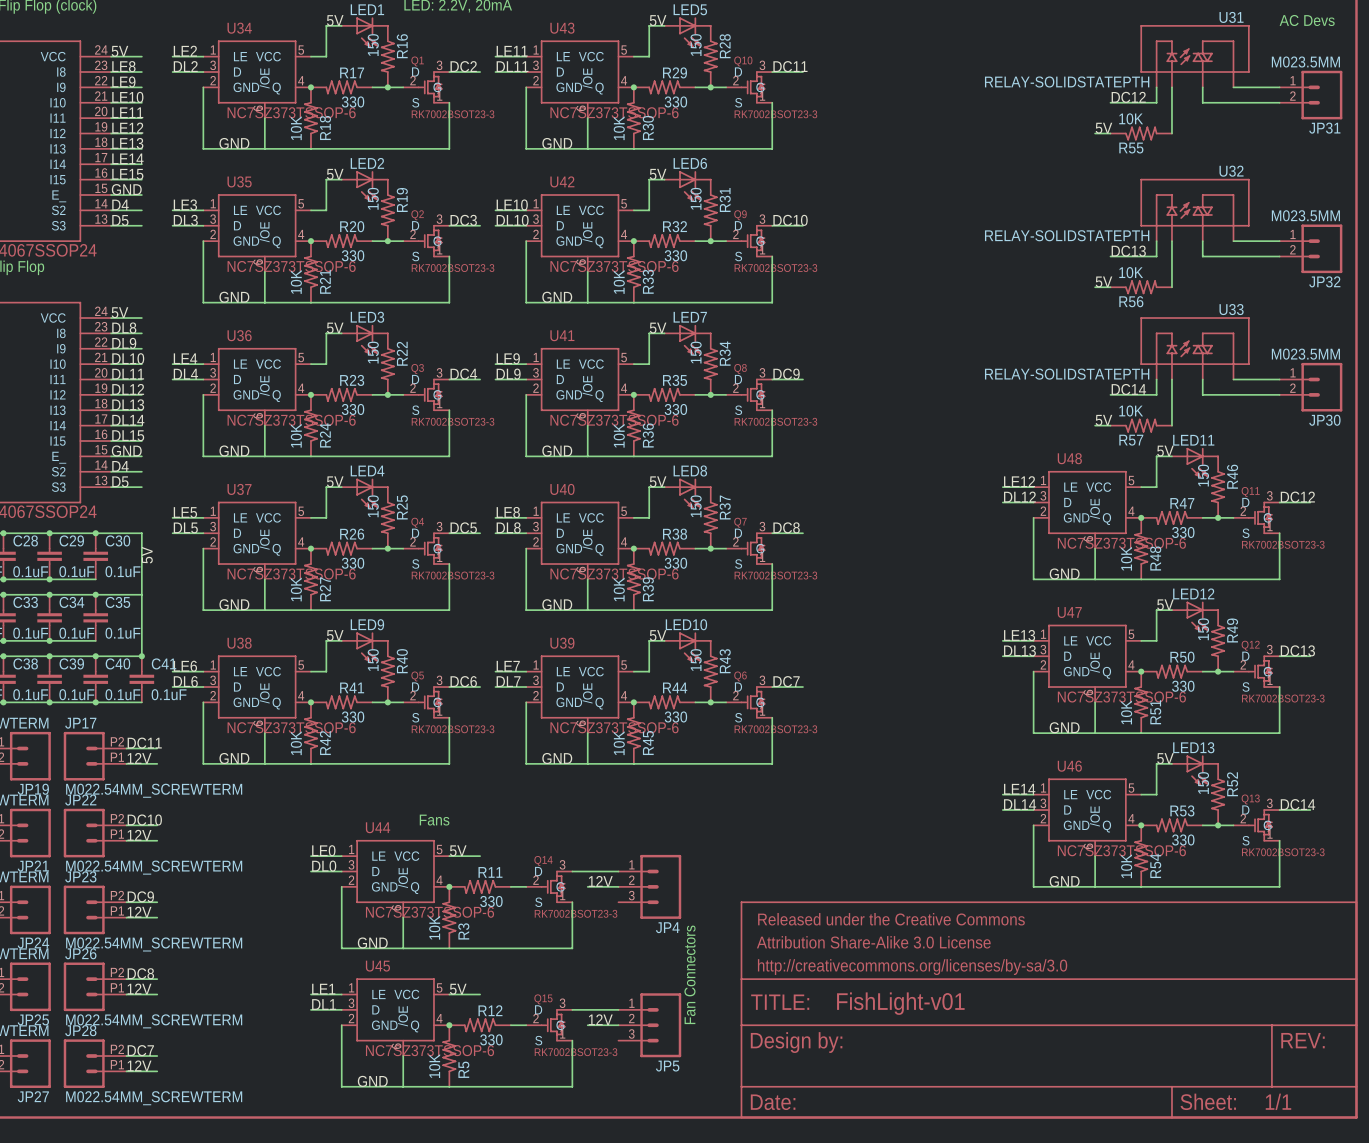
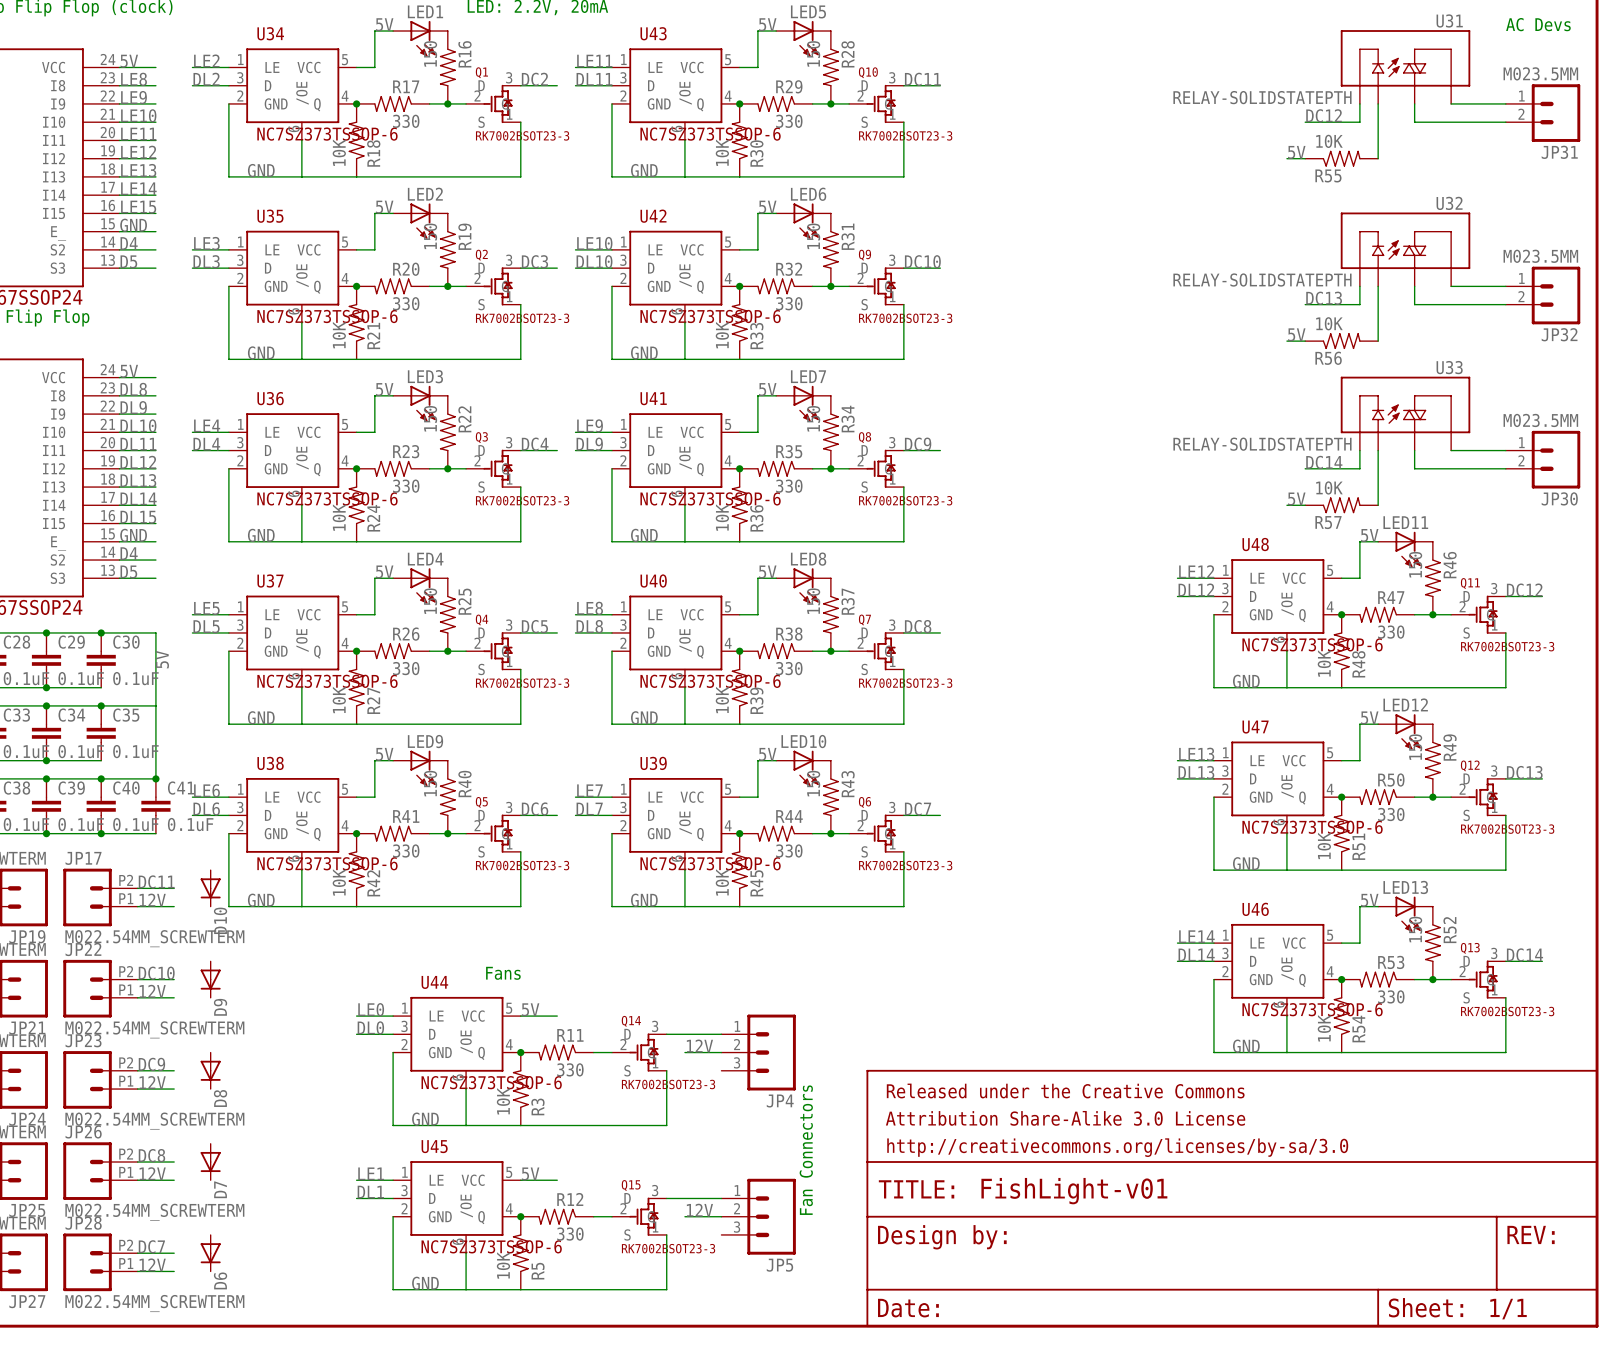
D10: none -> (210, 888)
D9: none -> (210, 979)
D8: none -> (210, 1070)
D7: none -> (210, 1162)
D6: none -> (210, 1253)

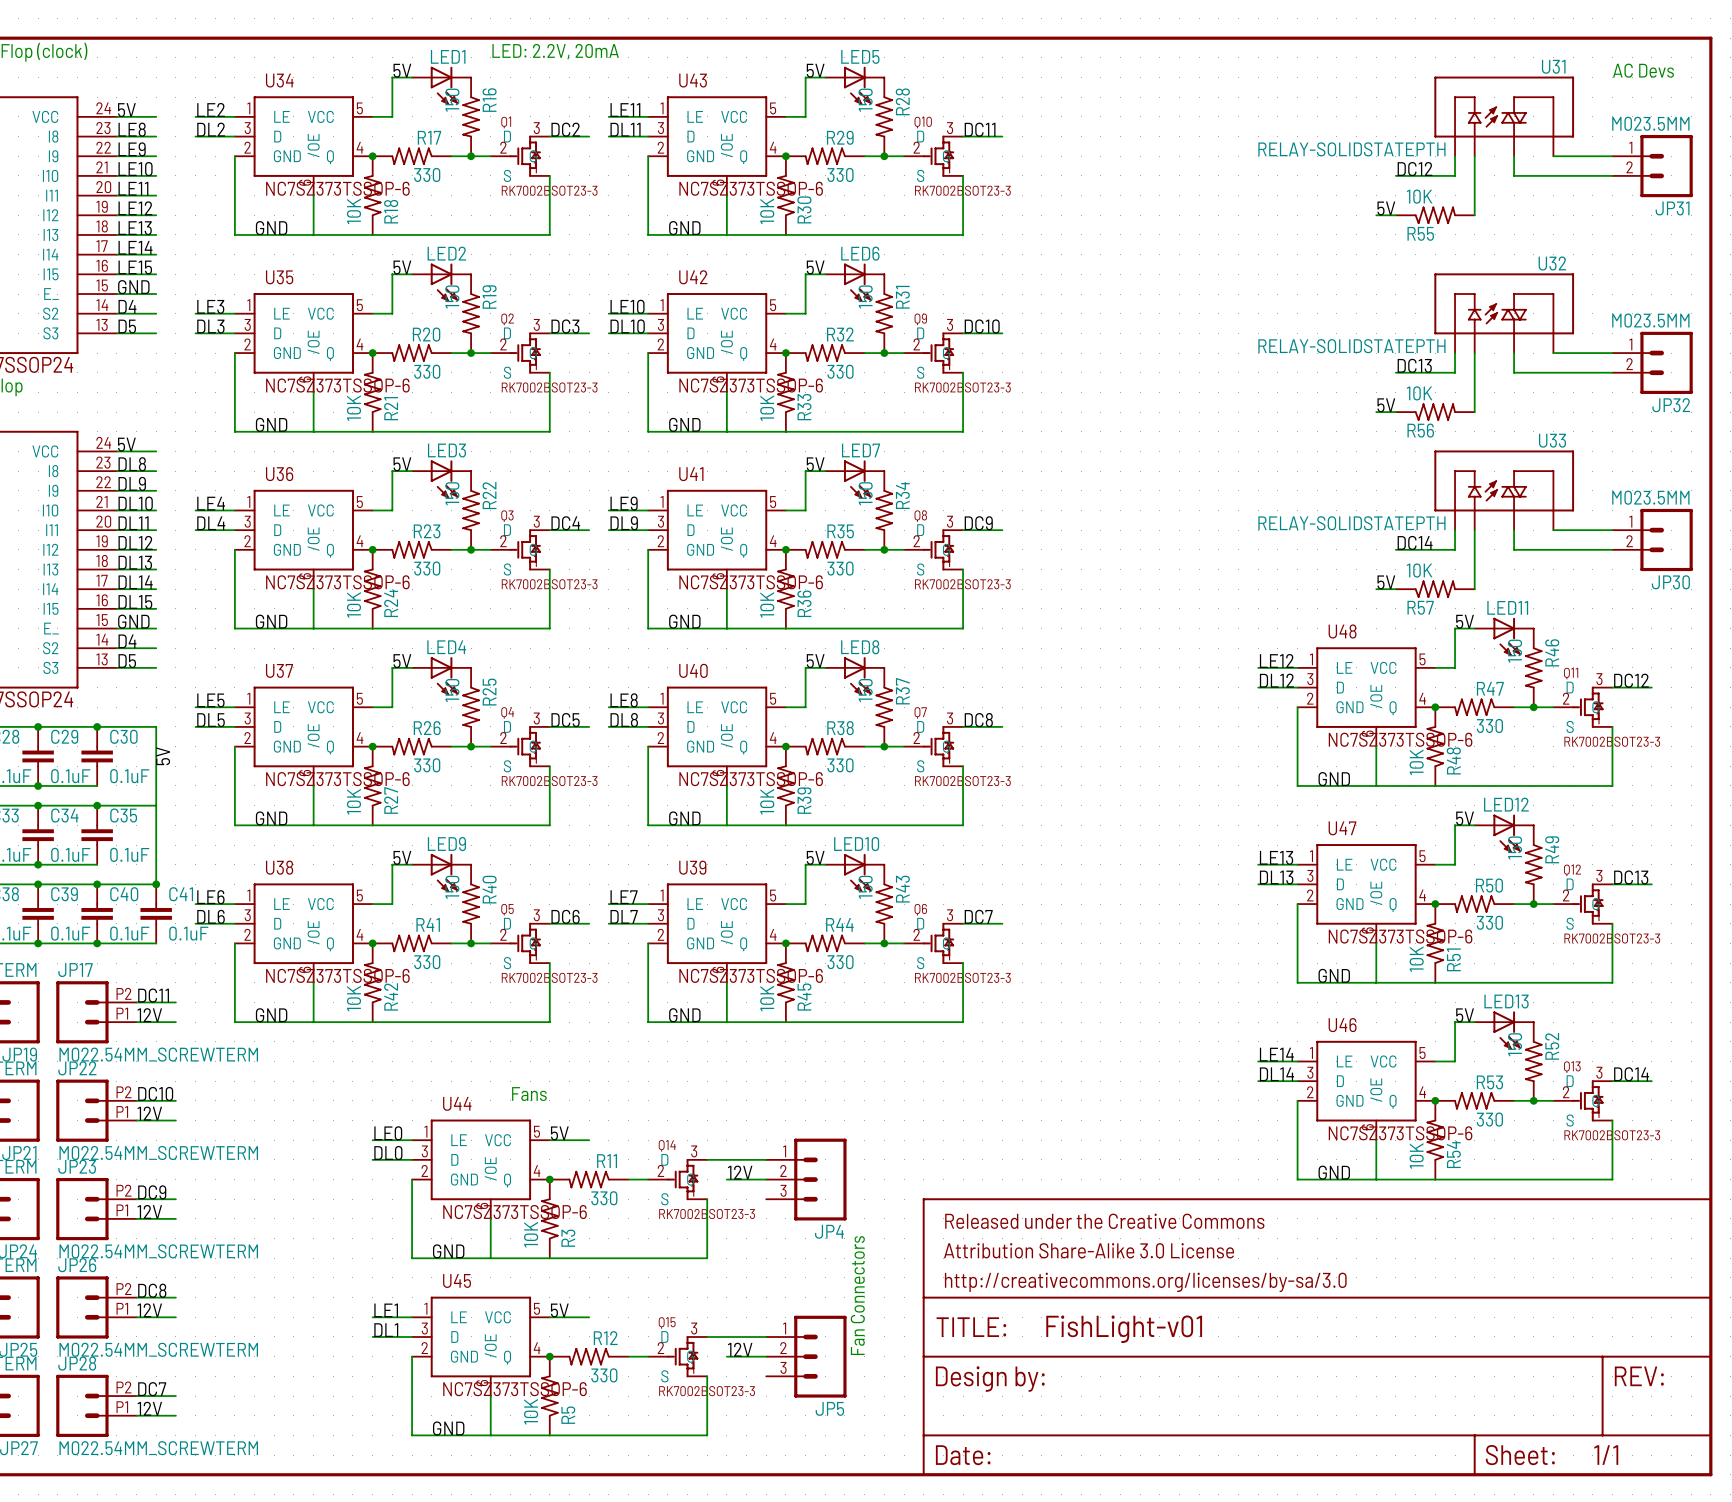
D10: (210, 888) -> none
D9: (210, 979) -> none
D8: (210, 1070) -> none
D7: (210, 1162) -> none
D6: (210, 1253) -> none

